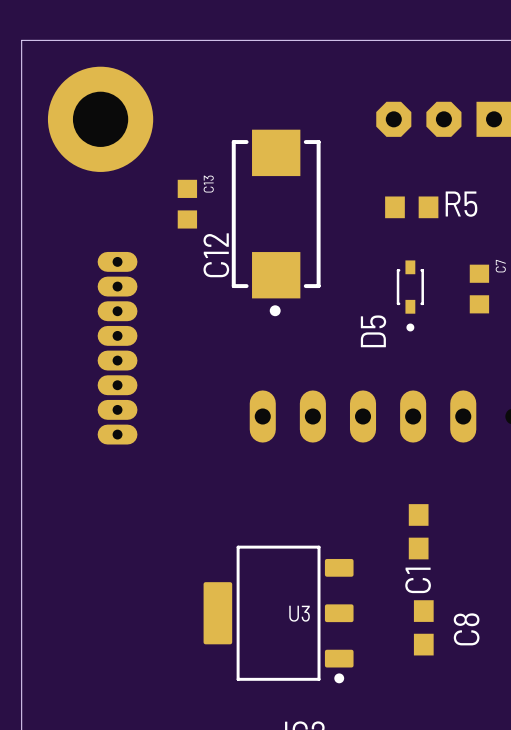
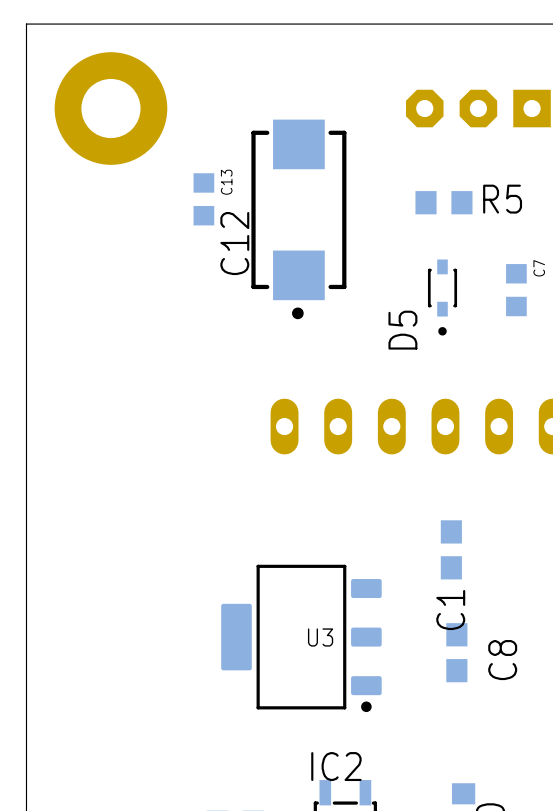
part: (117, 348) -> none

